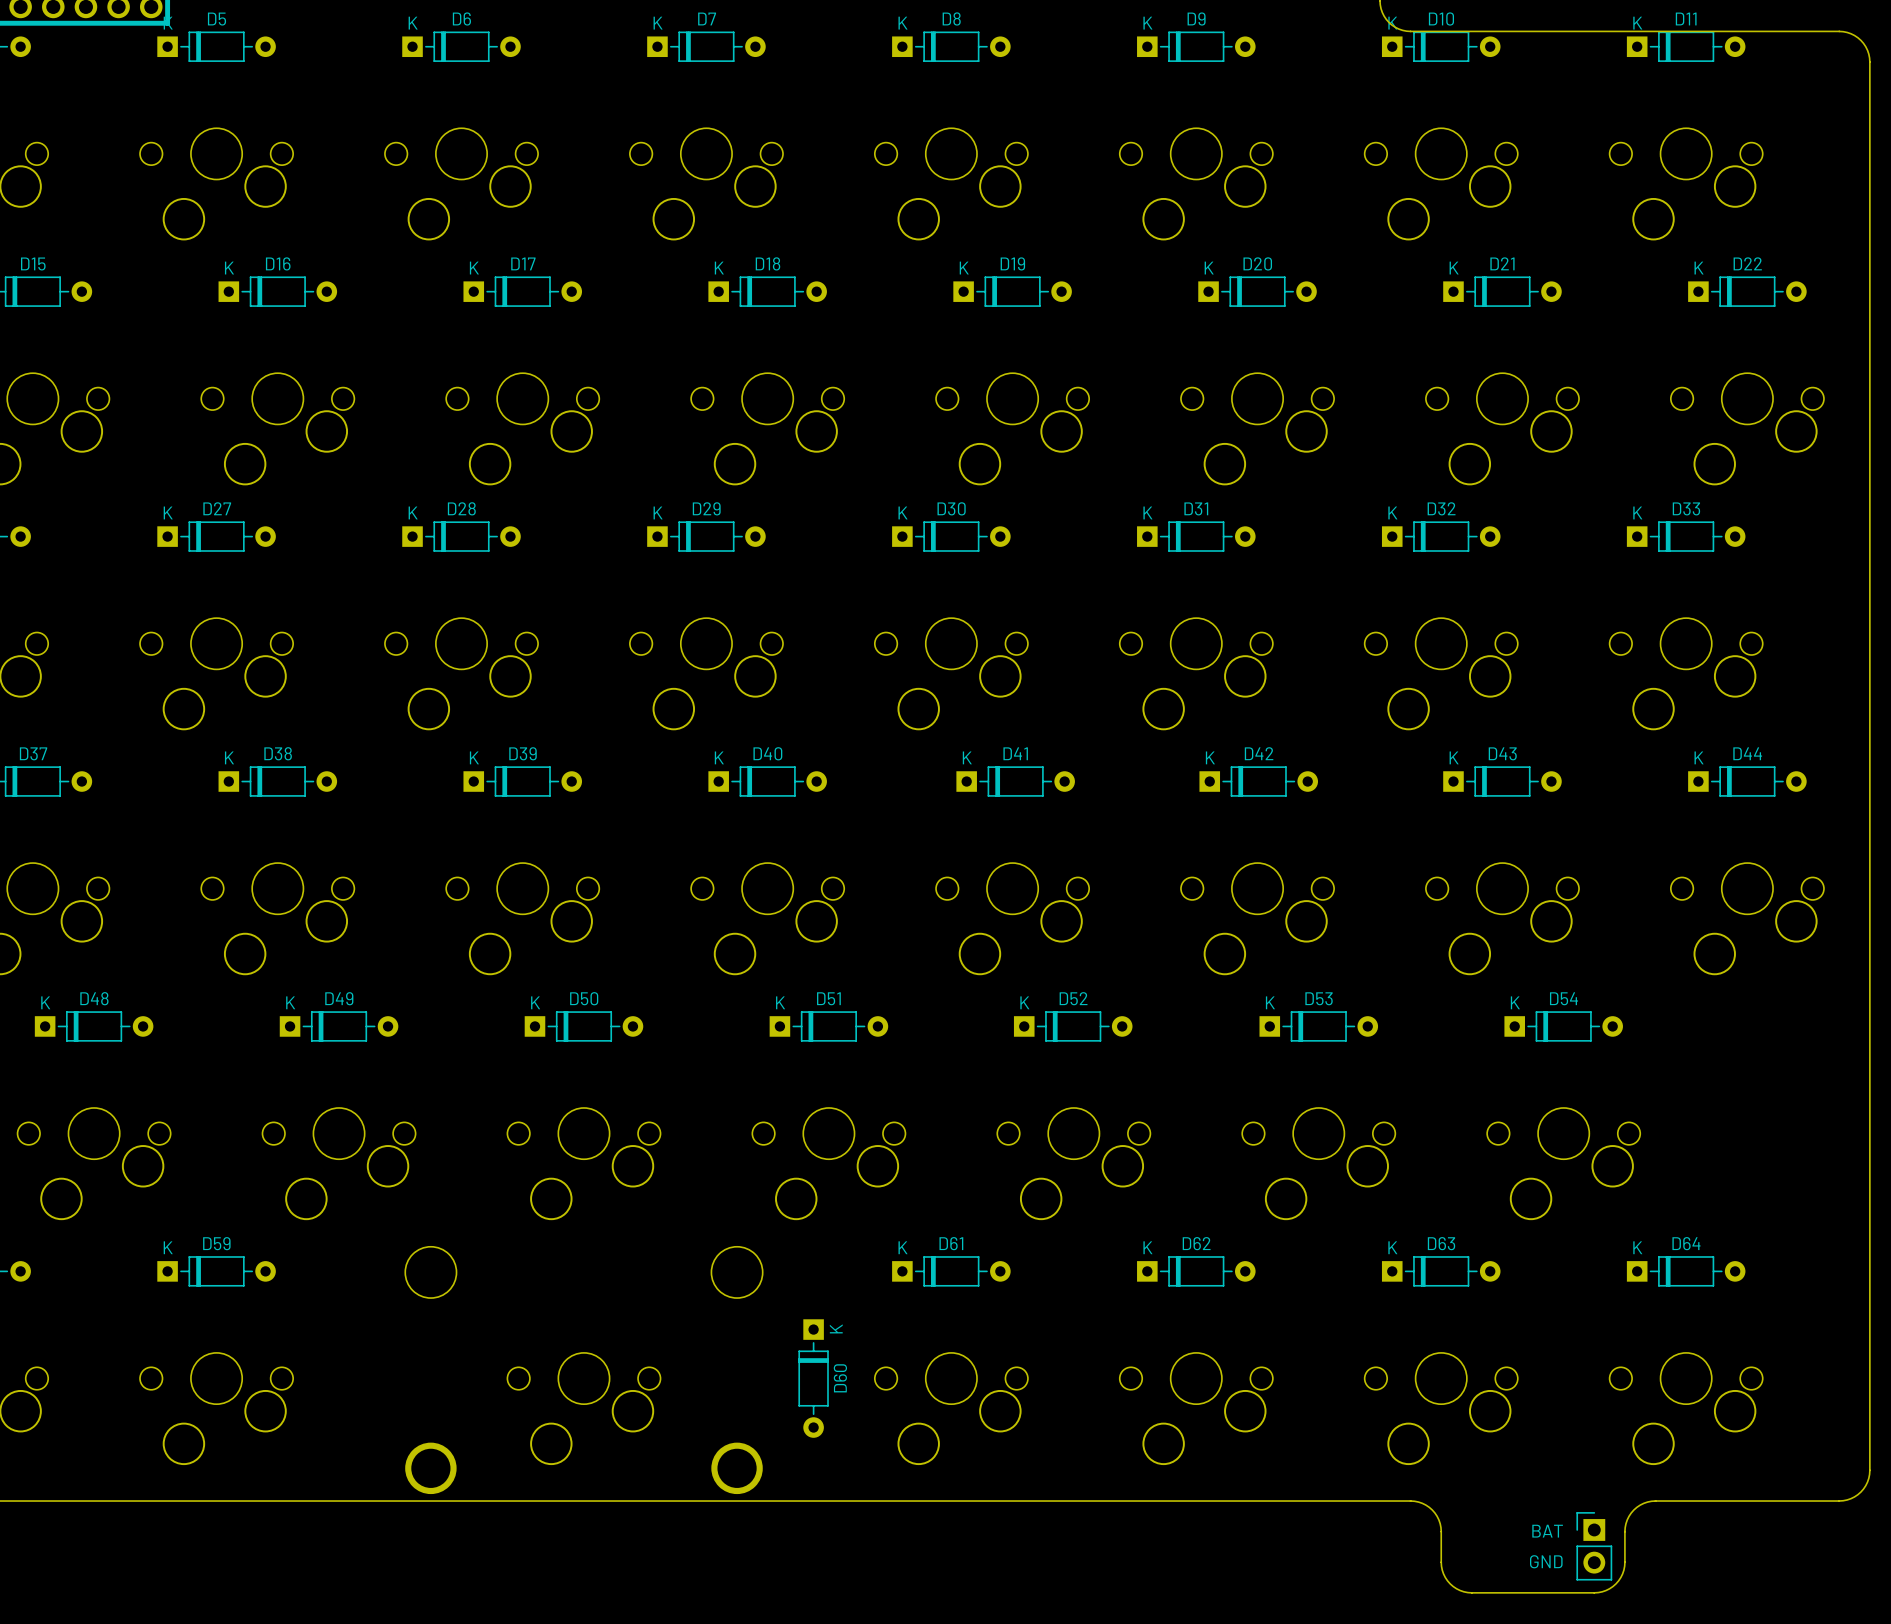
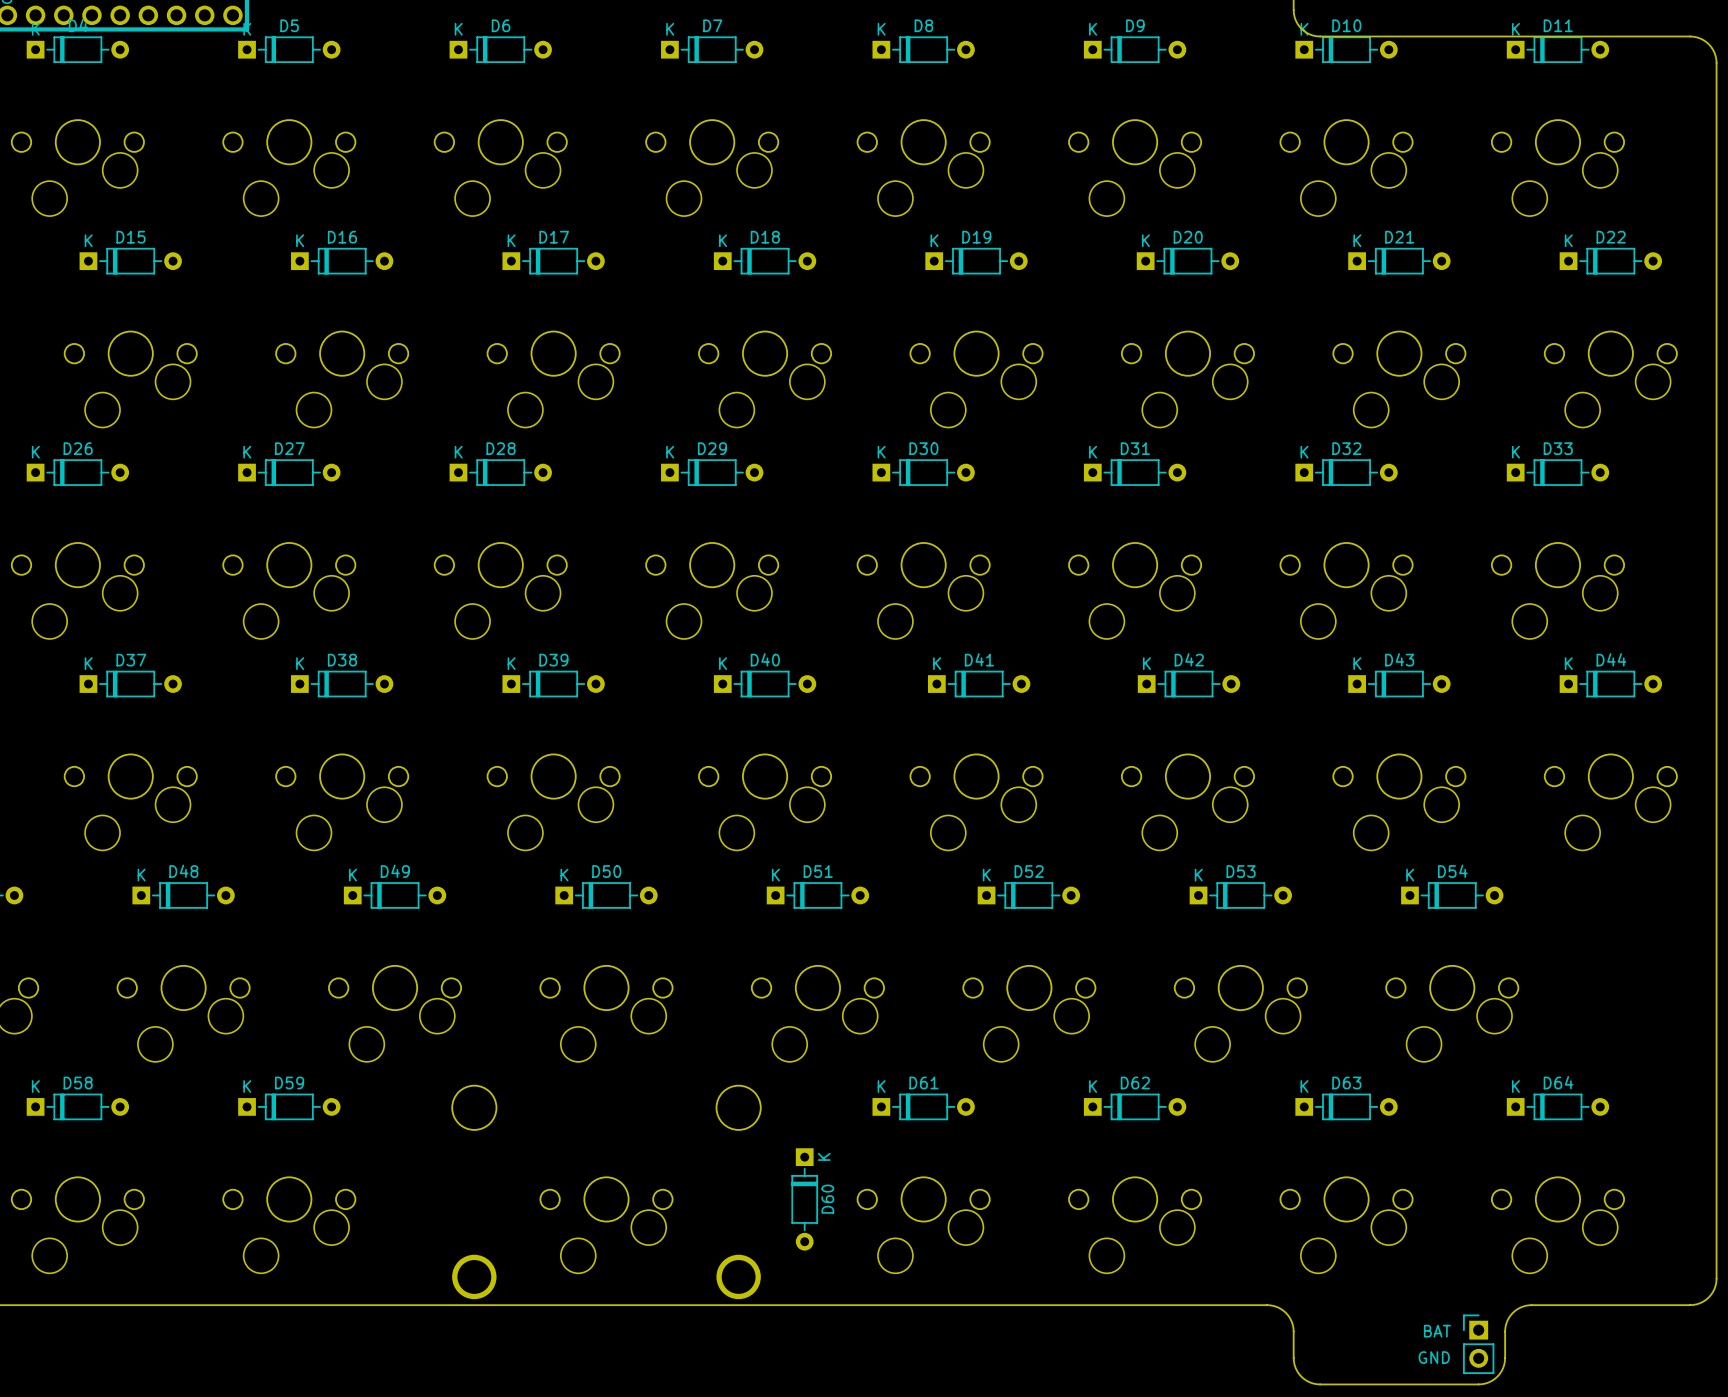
board edge: (1349, 1501) (1414, 1501) (1429, 1507) (1437, 1516) (1440, 1523) (1441, 1566) (1445, 1577) (1456, 1588) (1471, 1592) -> (1267, 1305) (1280, 1308) (1290, 1318) (1293, 1328) (1294, 1364) (1304, 1378) (1316, 1384) (1372, 1384)

